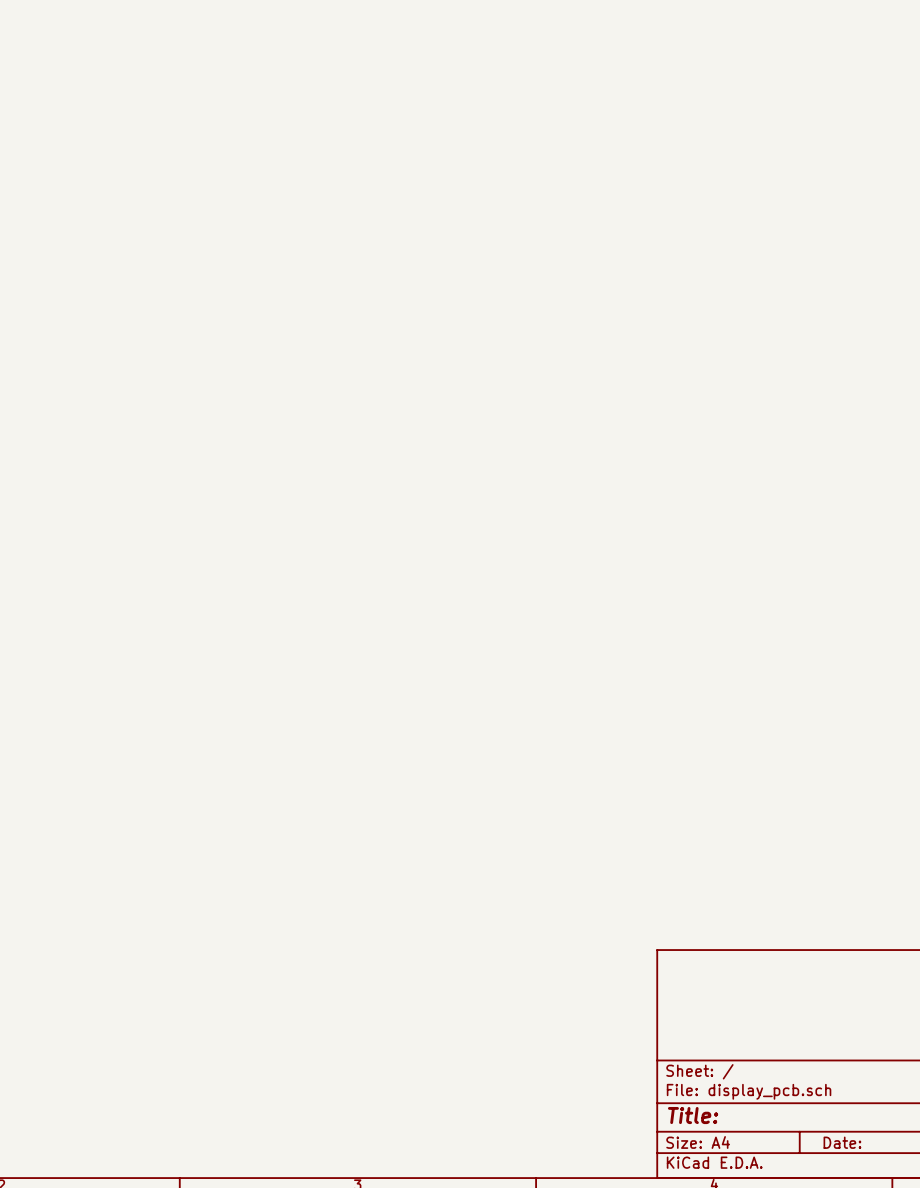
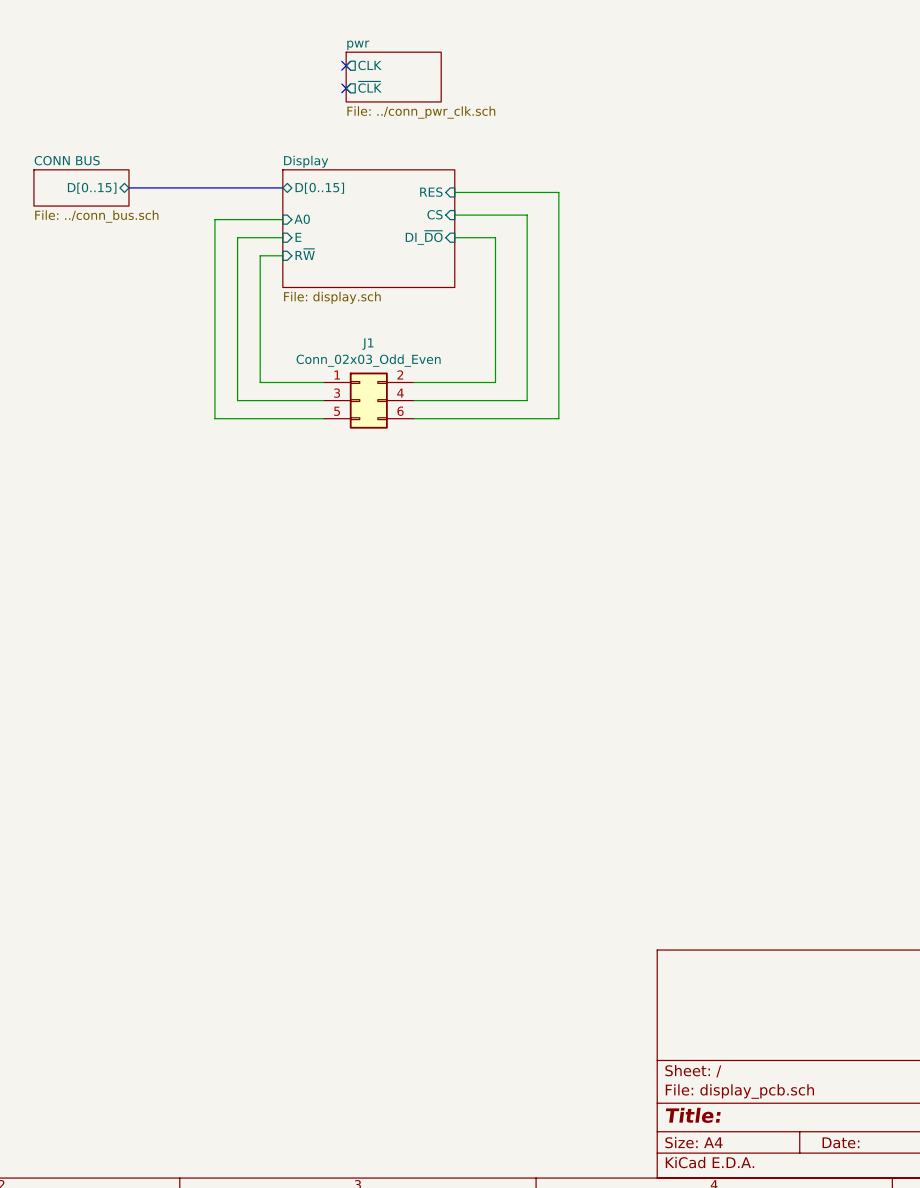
no-connect mark: none -> (346, 65)
sheet pin: none -> CLK (370, 65)
sheet pwr: none -> File: ../conn_pwr_clk.sch (393, 77)
sheet pin: none -> ~{CLK} (370, 87)
no-connect mark: none -> (346, 88)
sheet CONN BUS: none -> File: ../conn_bus.sch (81, 187)
bus: none -> (128, 187) (282, 187)
sheet pin: none -> D[0..15] (92, 188)
sheet pin: none -> D[0..15] (319, 188)
sheet pin: none -> RES (431, 192)
wire: none -> (454, 192) (558, 192) (558, 418) (414, 418)
sheet pin: none -> CS (435, 214)
wire: none -> (454, 215) (527, 215) (527, 400) (414, 400)
wire: none -> (282, 219) (214, 219) (214, 418) (323, 418)
sheet pin: none -> A0 (302, 219)
sheet Display: none -> File: display.sch (368, 228)
sheet pin: none -> DI_~{DO} (424, 237)
wire: none -> (282, 237) (237, 237) (237, 400) (323, 400)
sheet pin: none -> E (298, 237)
wire: none -> (454, 237) (495, 237) (495, 382) (414, 382)
sheet pin: none -> R~{W} (305, 254)
wire: none -> (282, 255) (260, 255) (260, 382) (323, 382)
J1: none -> Conn_02x03_Odd_Even (368, 400)

